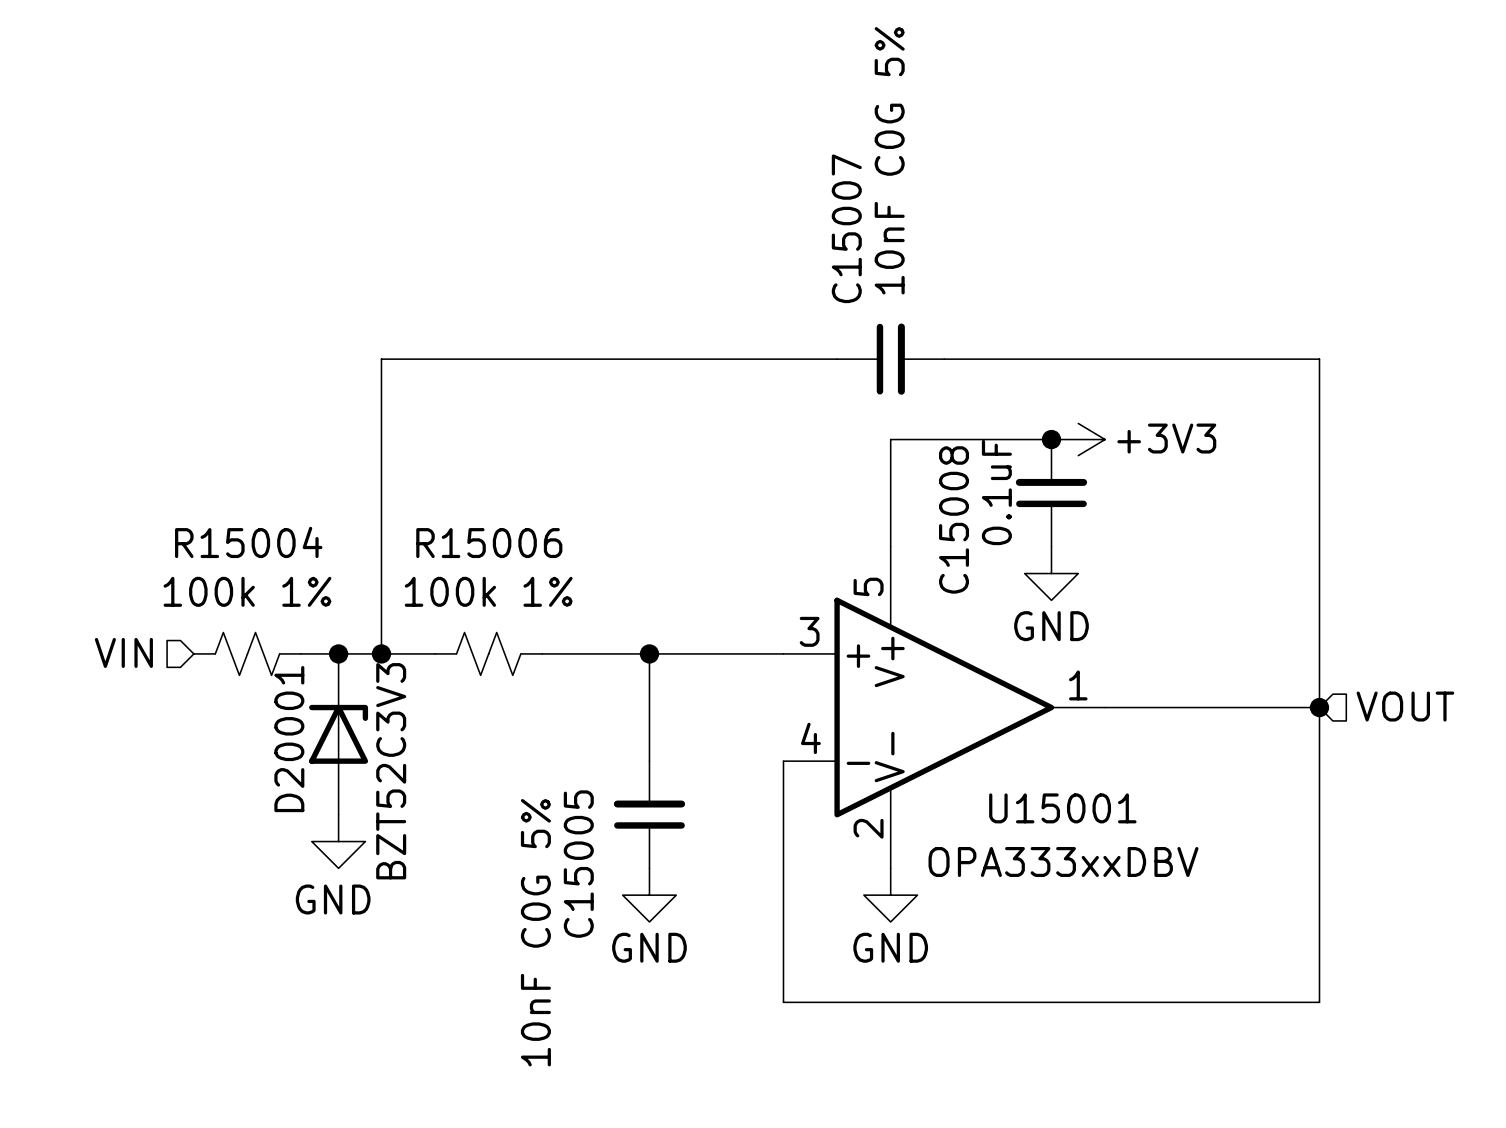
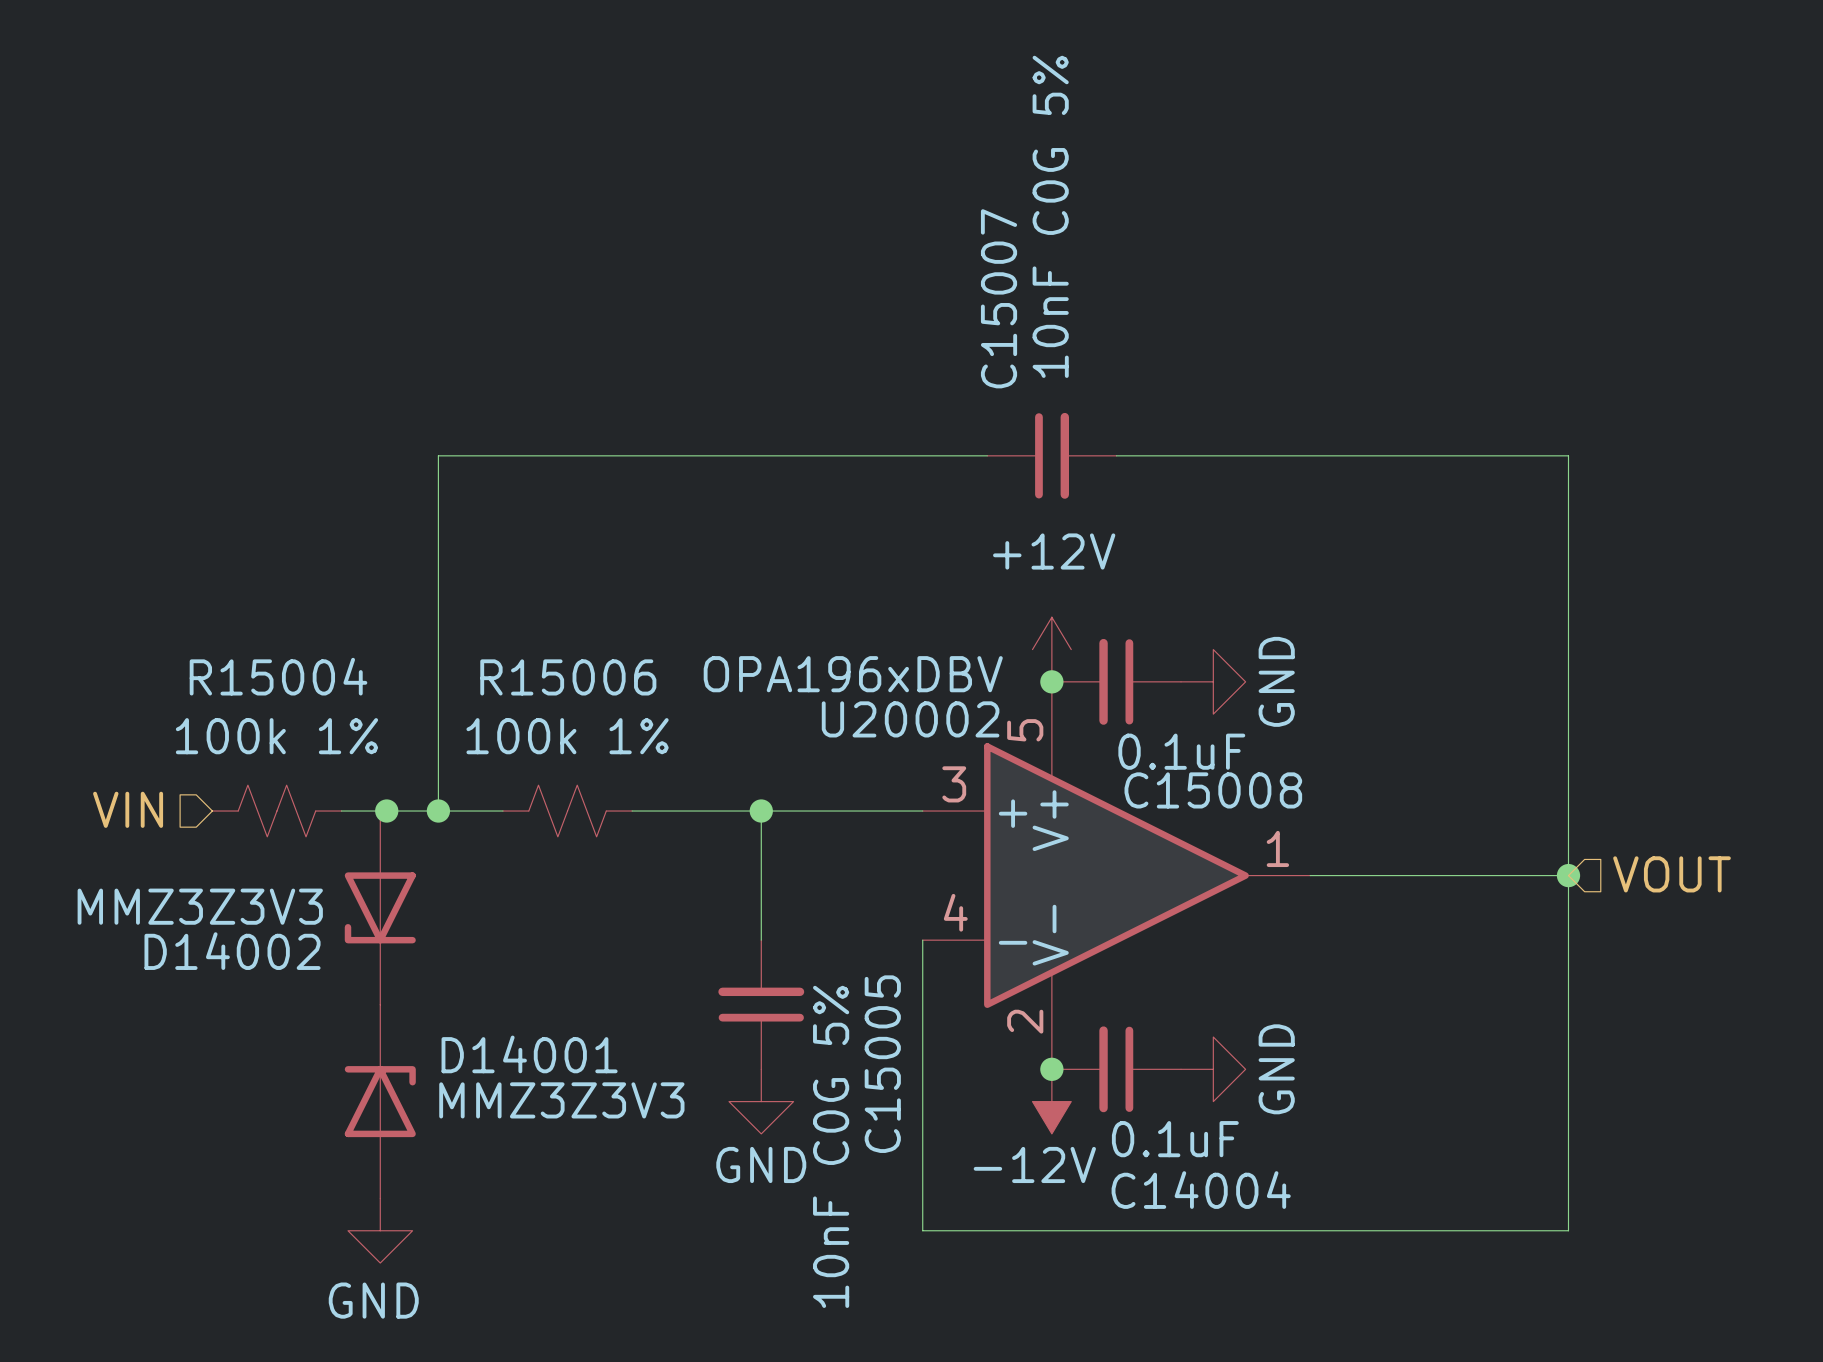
wire: (1051, 439) (890, 439) (890, 546) -> none
junction: (1051, 439) -> none
power symbol: +3V3 (1078, 439) -> none
C15008 value position: 0.1uF (996, 492) -> 0.1uF (1181, 751)
C15008 rotation: 0° (1051, 493) -> 90° counterclockwise (1116, 681)
C15008 position: (1051, 493) -> (1116, 681)
power symbol: none -> +12V (1051, 649)
C15008 name position: C15008 (954, 519) -> C15008 (1213, 790)
junction: none -> (1051, 681)
power symbol rotation: 0° (1051, 573) -> 90° counterclockwise (1213, 681)
power symbol position: GND (1051, 573) -> GND (1213, 681)
D14002: none -> MMZ3Z3V3 (380, 907)
D20001: BZT52C3V3 (338, 734) -> none
U15001 name: U15001 (1062, 808) -> U20002 (910, 719)
power symbol position: GND (338, 841) -> GND (380, 1230)
U15001 value: OPA333xxDBV (1063, 861) -> OPA196xDBV (853, 674)
C15005 name position: C15005 (578, 864) -> C15005 (882, 1064)
junction: none -> (1051, 1069)
C14004: none -> 0.1uF (1116, 1069)
power symbol: none -> GND (1213, 1069)
D14001: none -> MMZ3Z3V3 (380, 1101)
power symbol: GND (890, 895) -> -12V (1051, 1101)
C15005 value position: 10nF C0G 5% (535, 932) -> 10nF C0G 5% (831, 1146)

